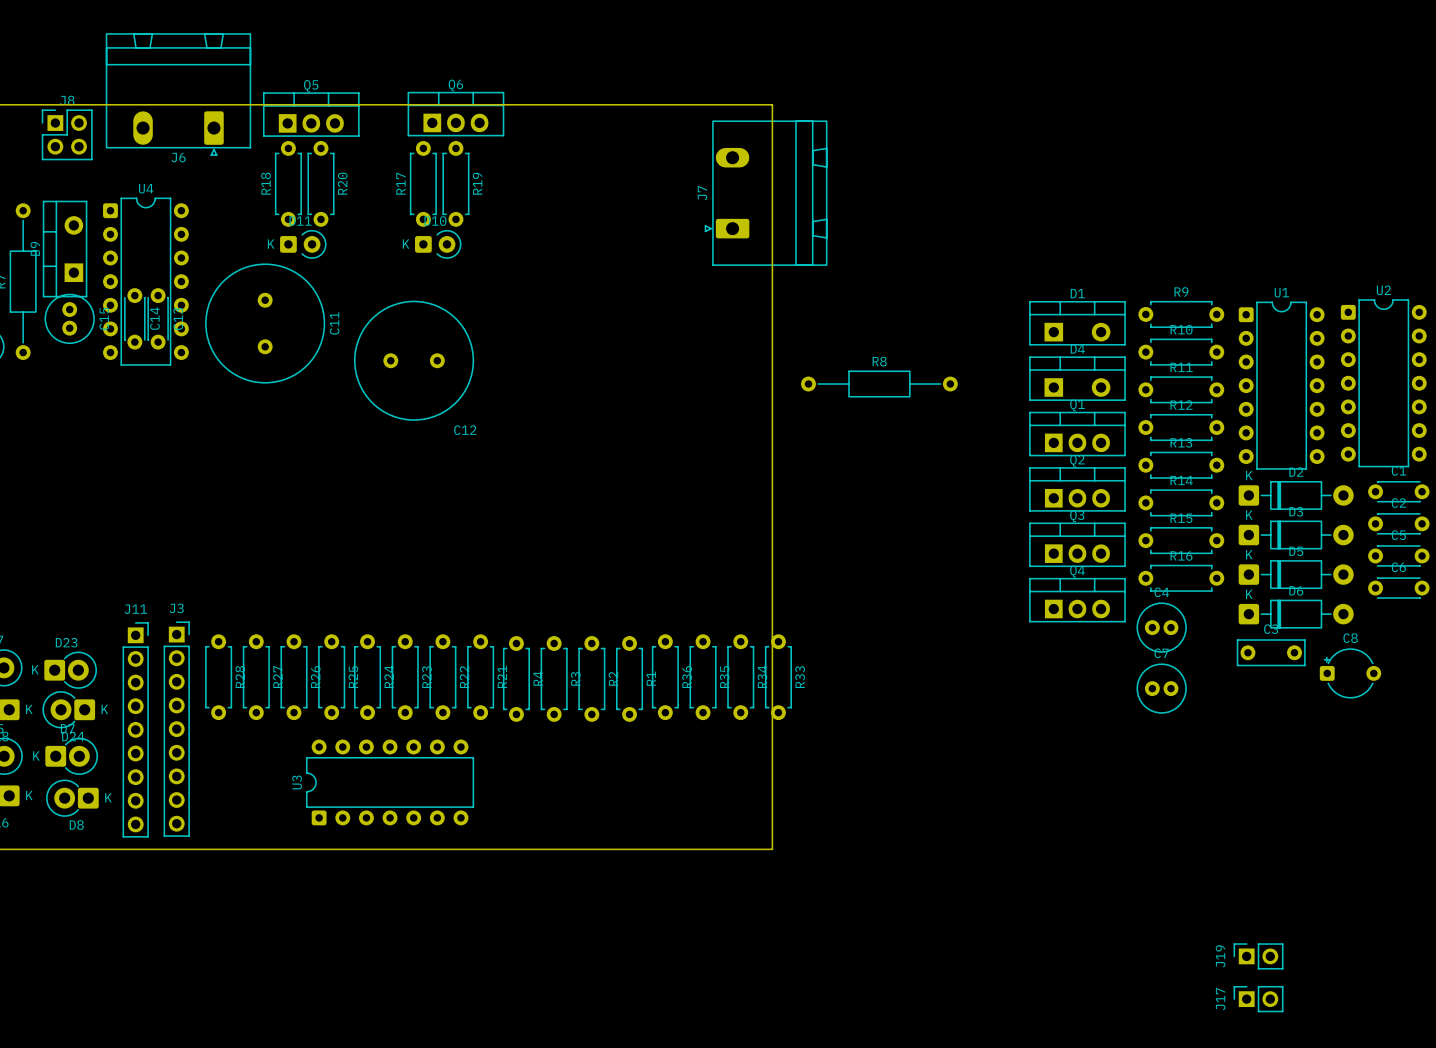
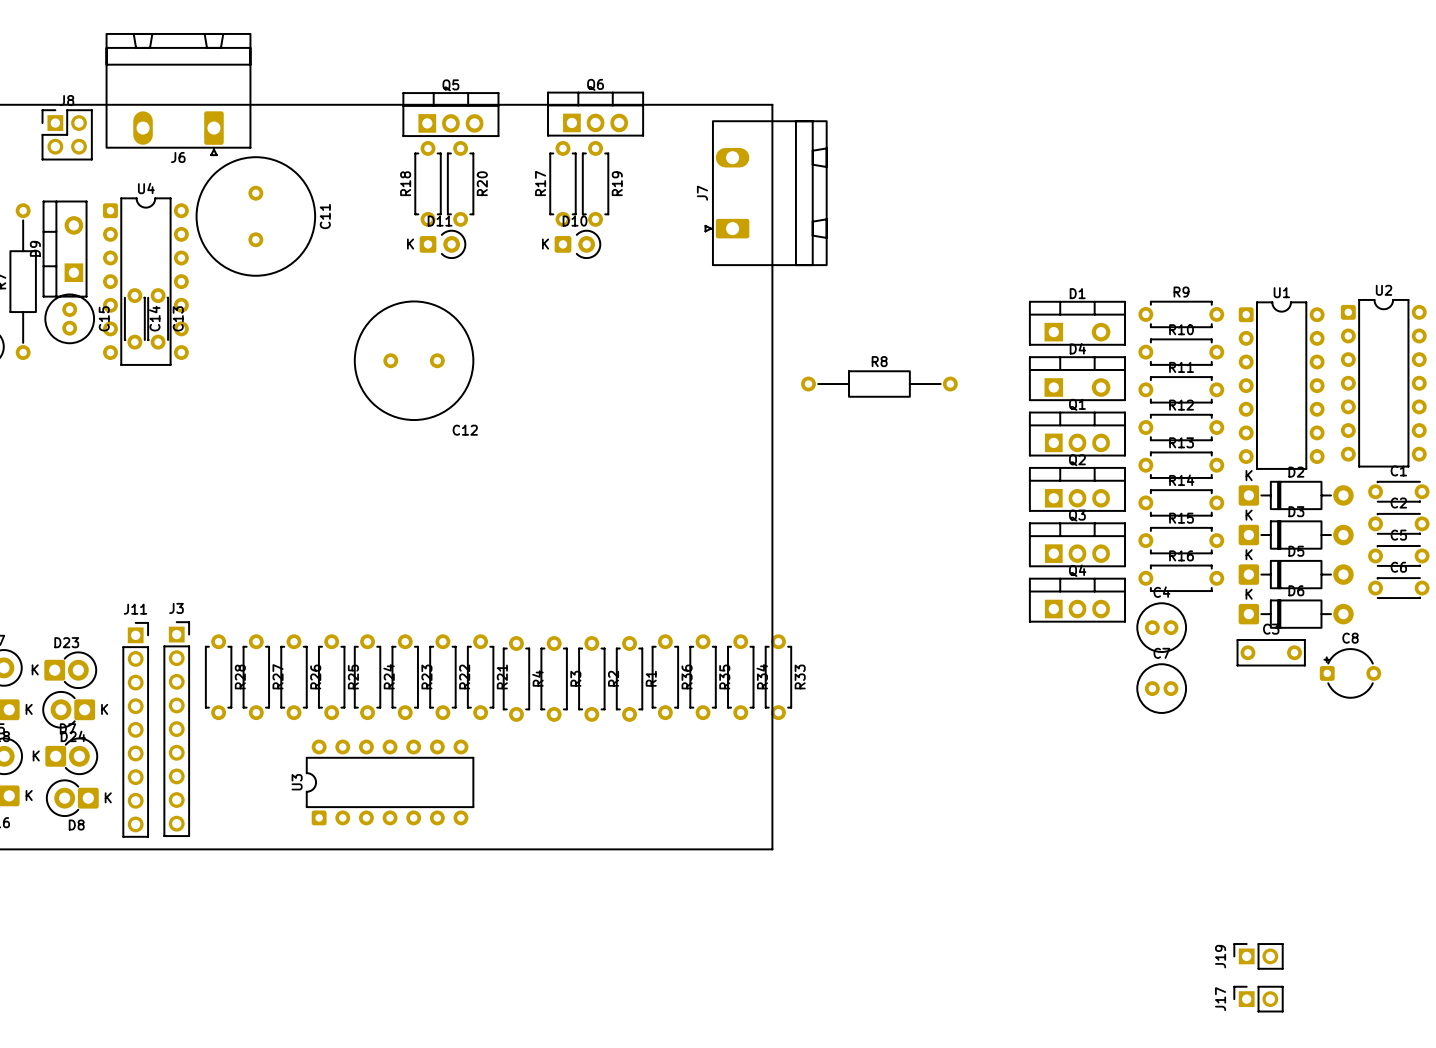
Q5 position: (311, 114) -> (450, 114)
Q6 position: (455, 114) -> (595, 114)
R18 position: (288, 183) -> (428, 183)
R20 position: (321, 183) -> (460, 183)
R17 position: (423, 183) -> (562, 183)
R19 position: (455, 183) -> (595, 183)
D11 position: (303, 244) -> (442, 244)
D10 position: (438, 244) -> (577, 244)
C11 position: (265, 323) -> (255, 216)

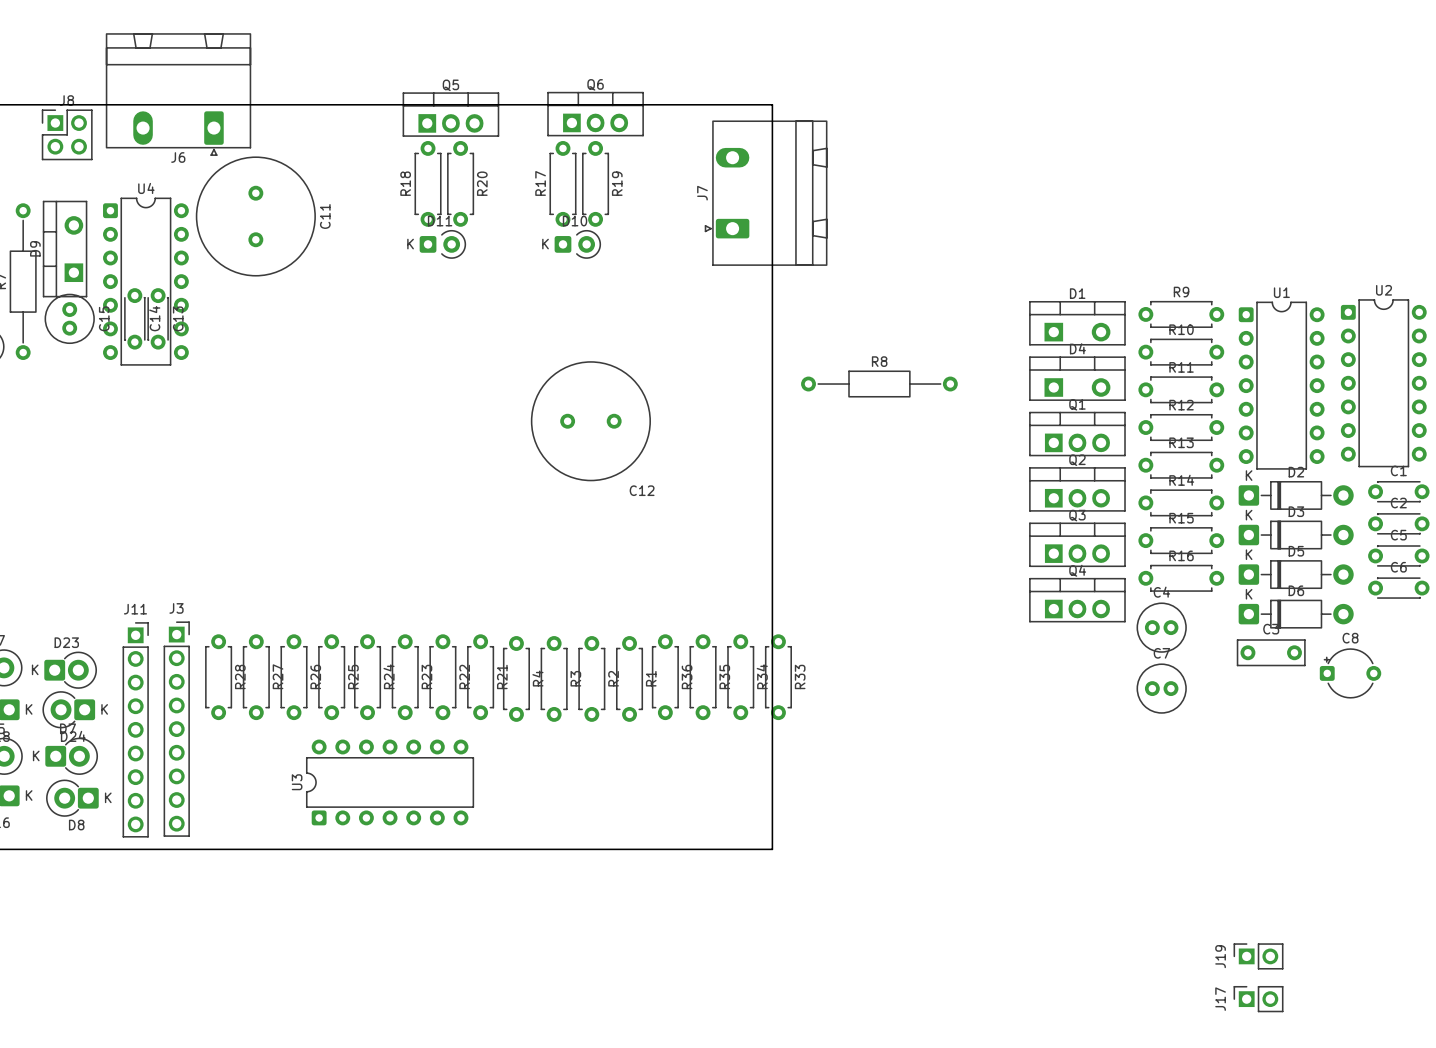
C12 position: (414, 360) -> (590, 421)

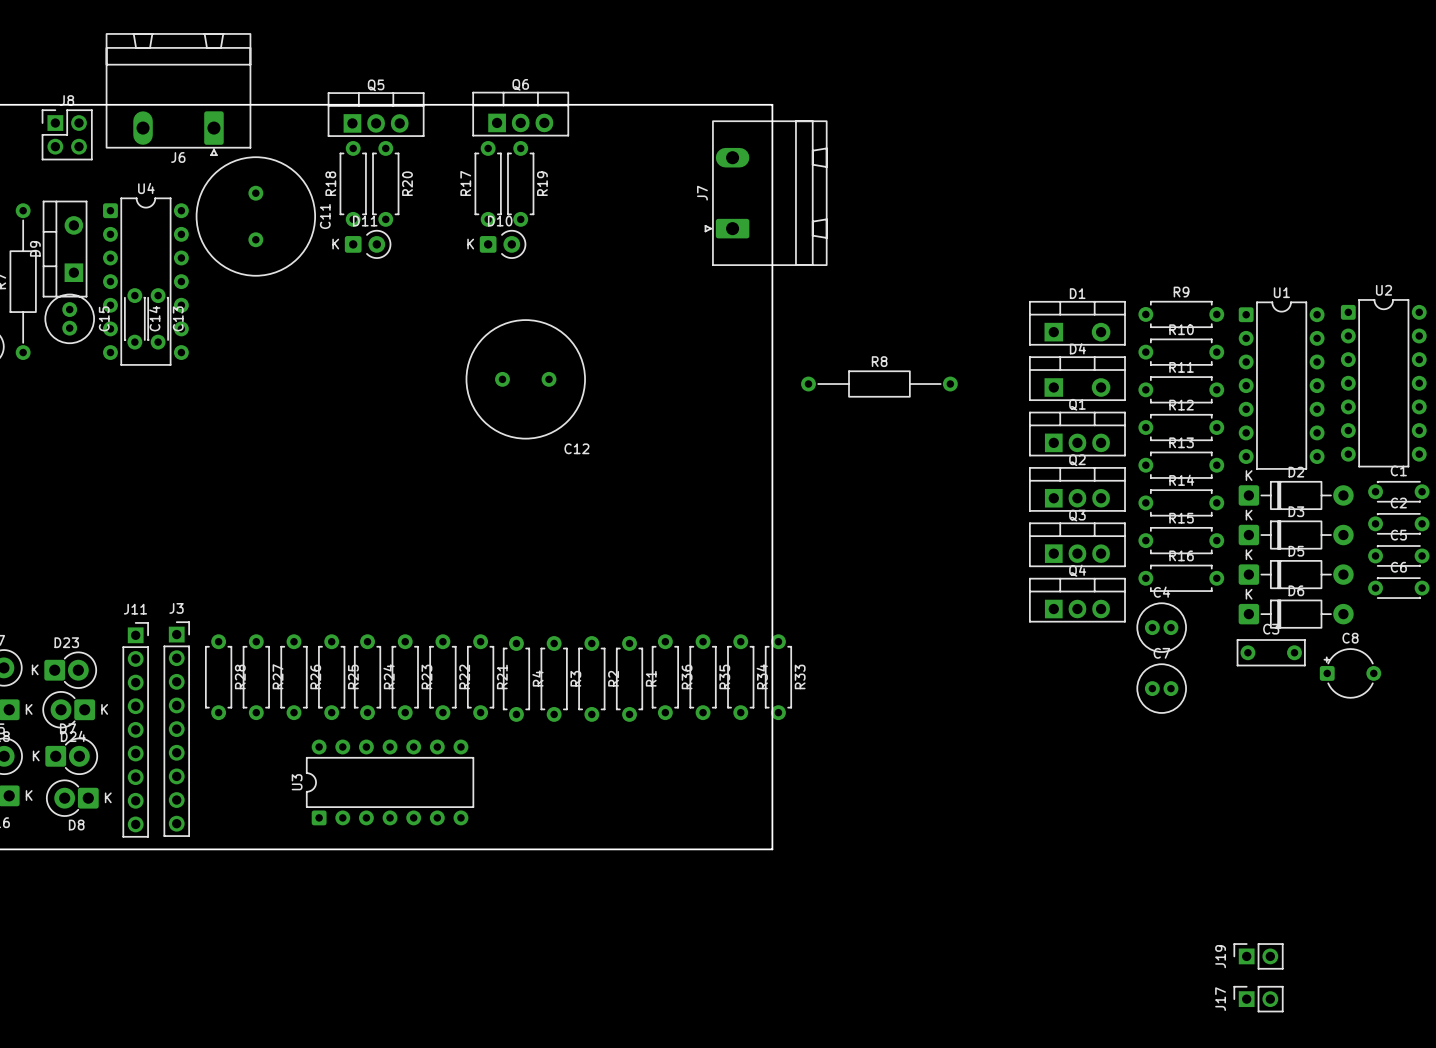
Q5 position: (450, 114) -> (376, 114)
Q6 position: (595, 114) -> (520, 114)
R18 position: (428, 183) -> (353, 183)
R20 position: (460, 183) -> (385, 183)
R17 position: (562, 183) -> (488, 183)
R19 position: (595, 183) -> (520, 183)
D11 position: (442, 244) -> (367, 244)
D10 position: (577, 244) -> (502, 244)
C12 position: (590, 421) -> (525, 379)

